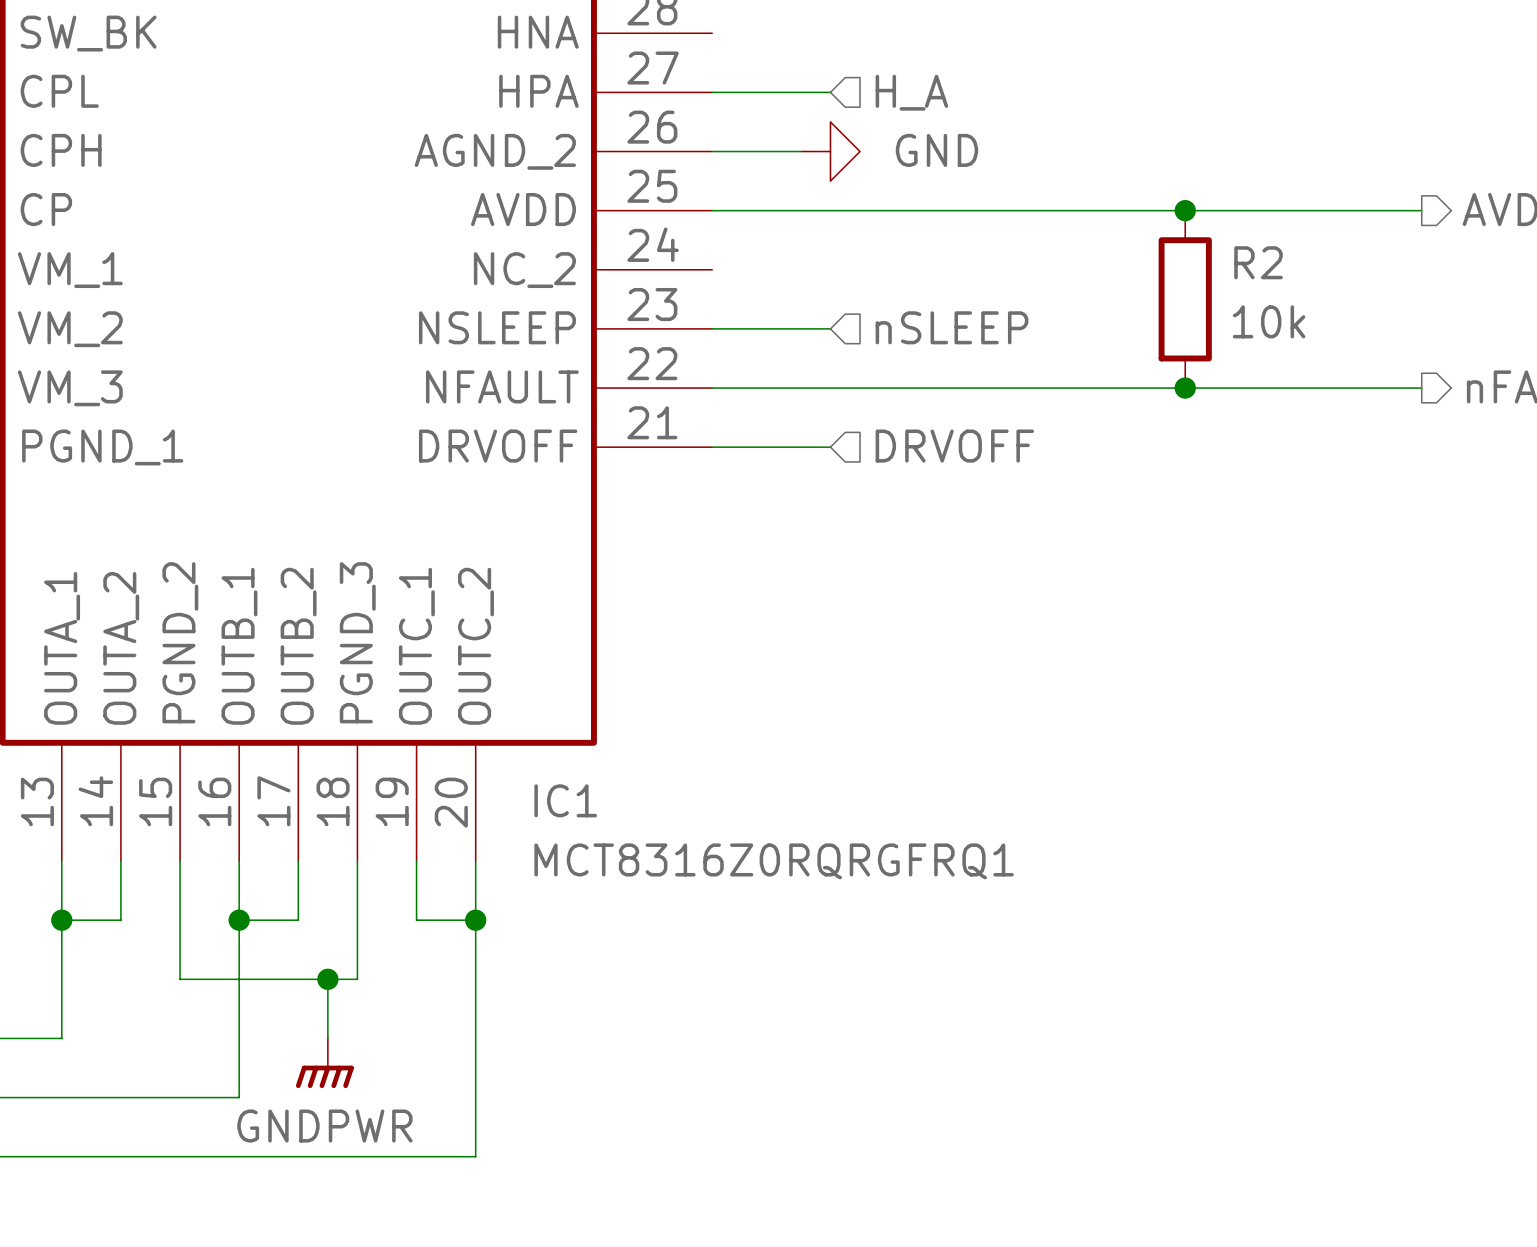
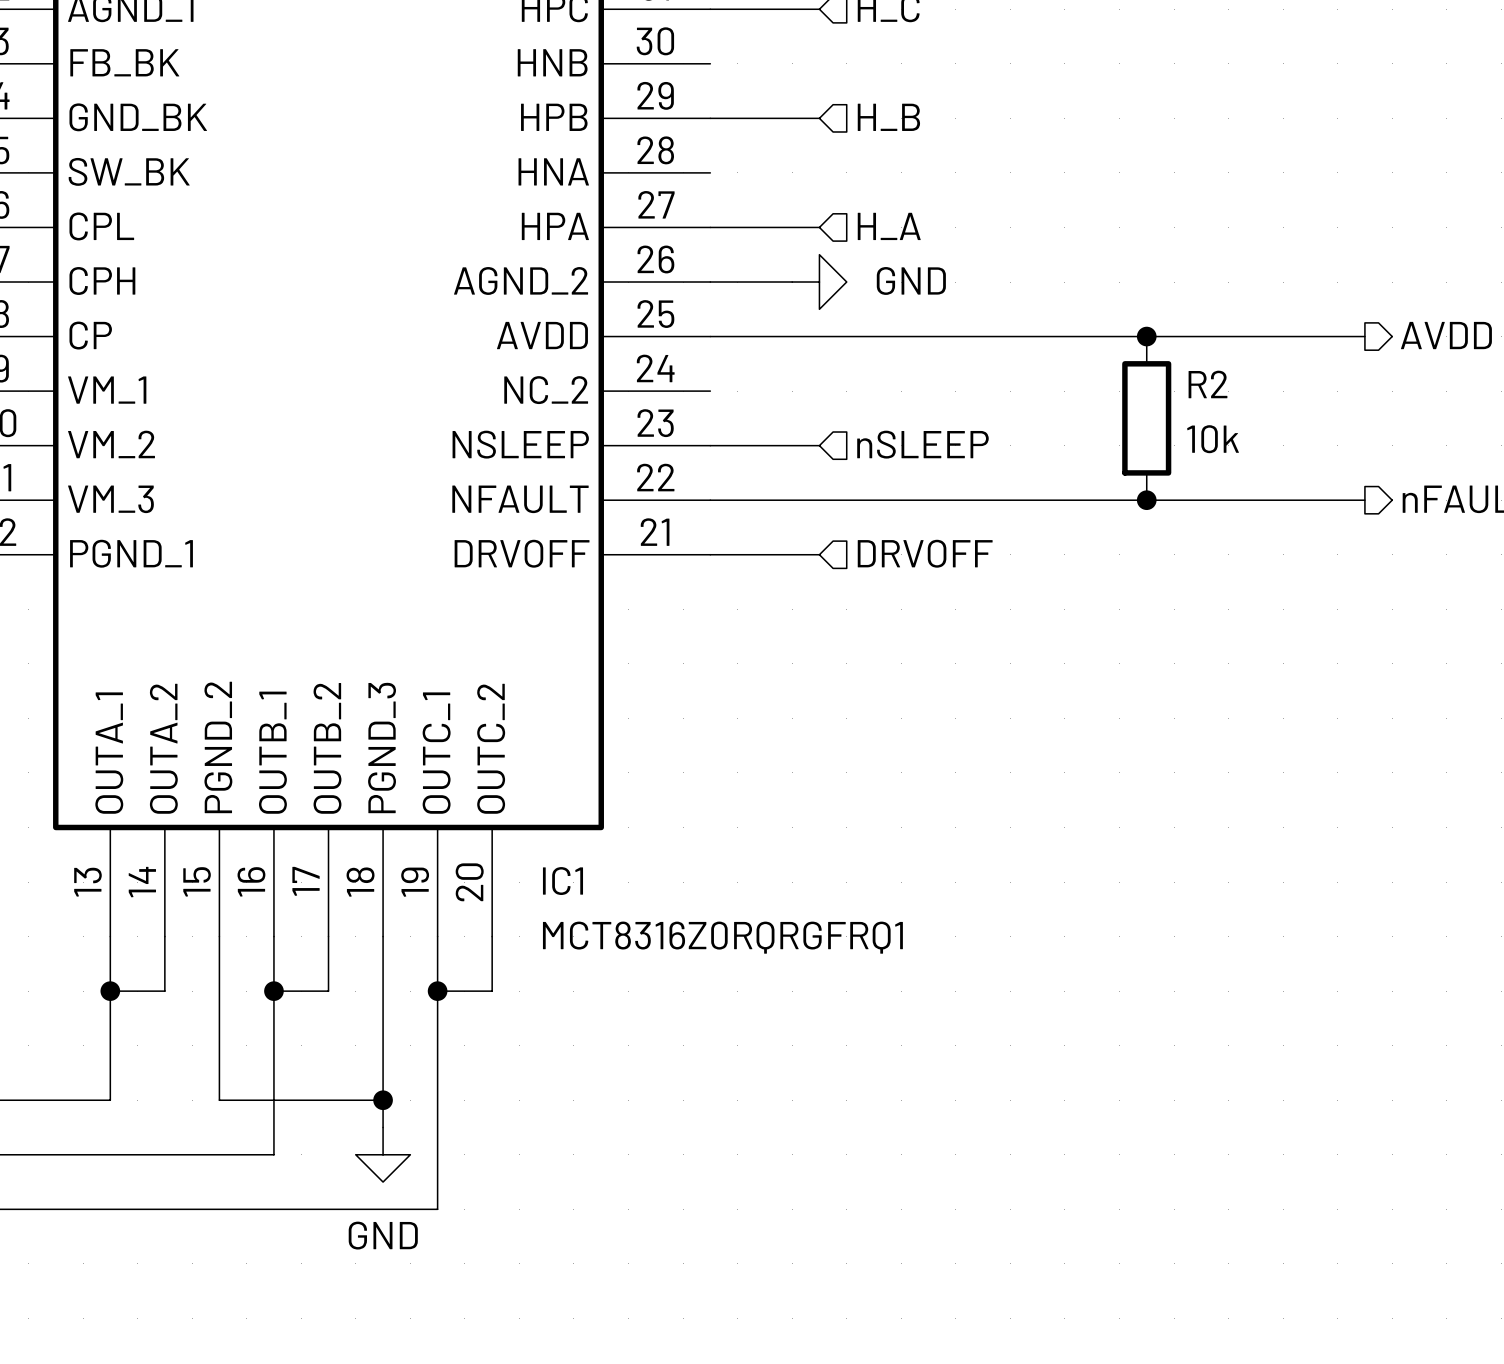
junction: none -> (437, 991)
wire: (475, 920) (475, 1156) (416, 1156) -> (437, 991) (437, 1209)
junction: (475, 920) -> none
wire: (180, 979) (357, 979) -> (219, 1045) (219, 1100) (383, 1100)
wire: (327, 979) (327, 1038) -> none
junction: (327, 979) -> none
wire: none -> (383, 1045) (383, 1127)
junction: none -> (383, 1100)
power symbol: GNDPWR (324, 1063) -> none
power symbol: none -> GND (383, 1154)

